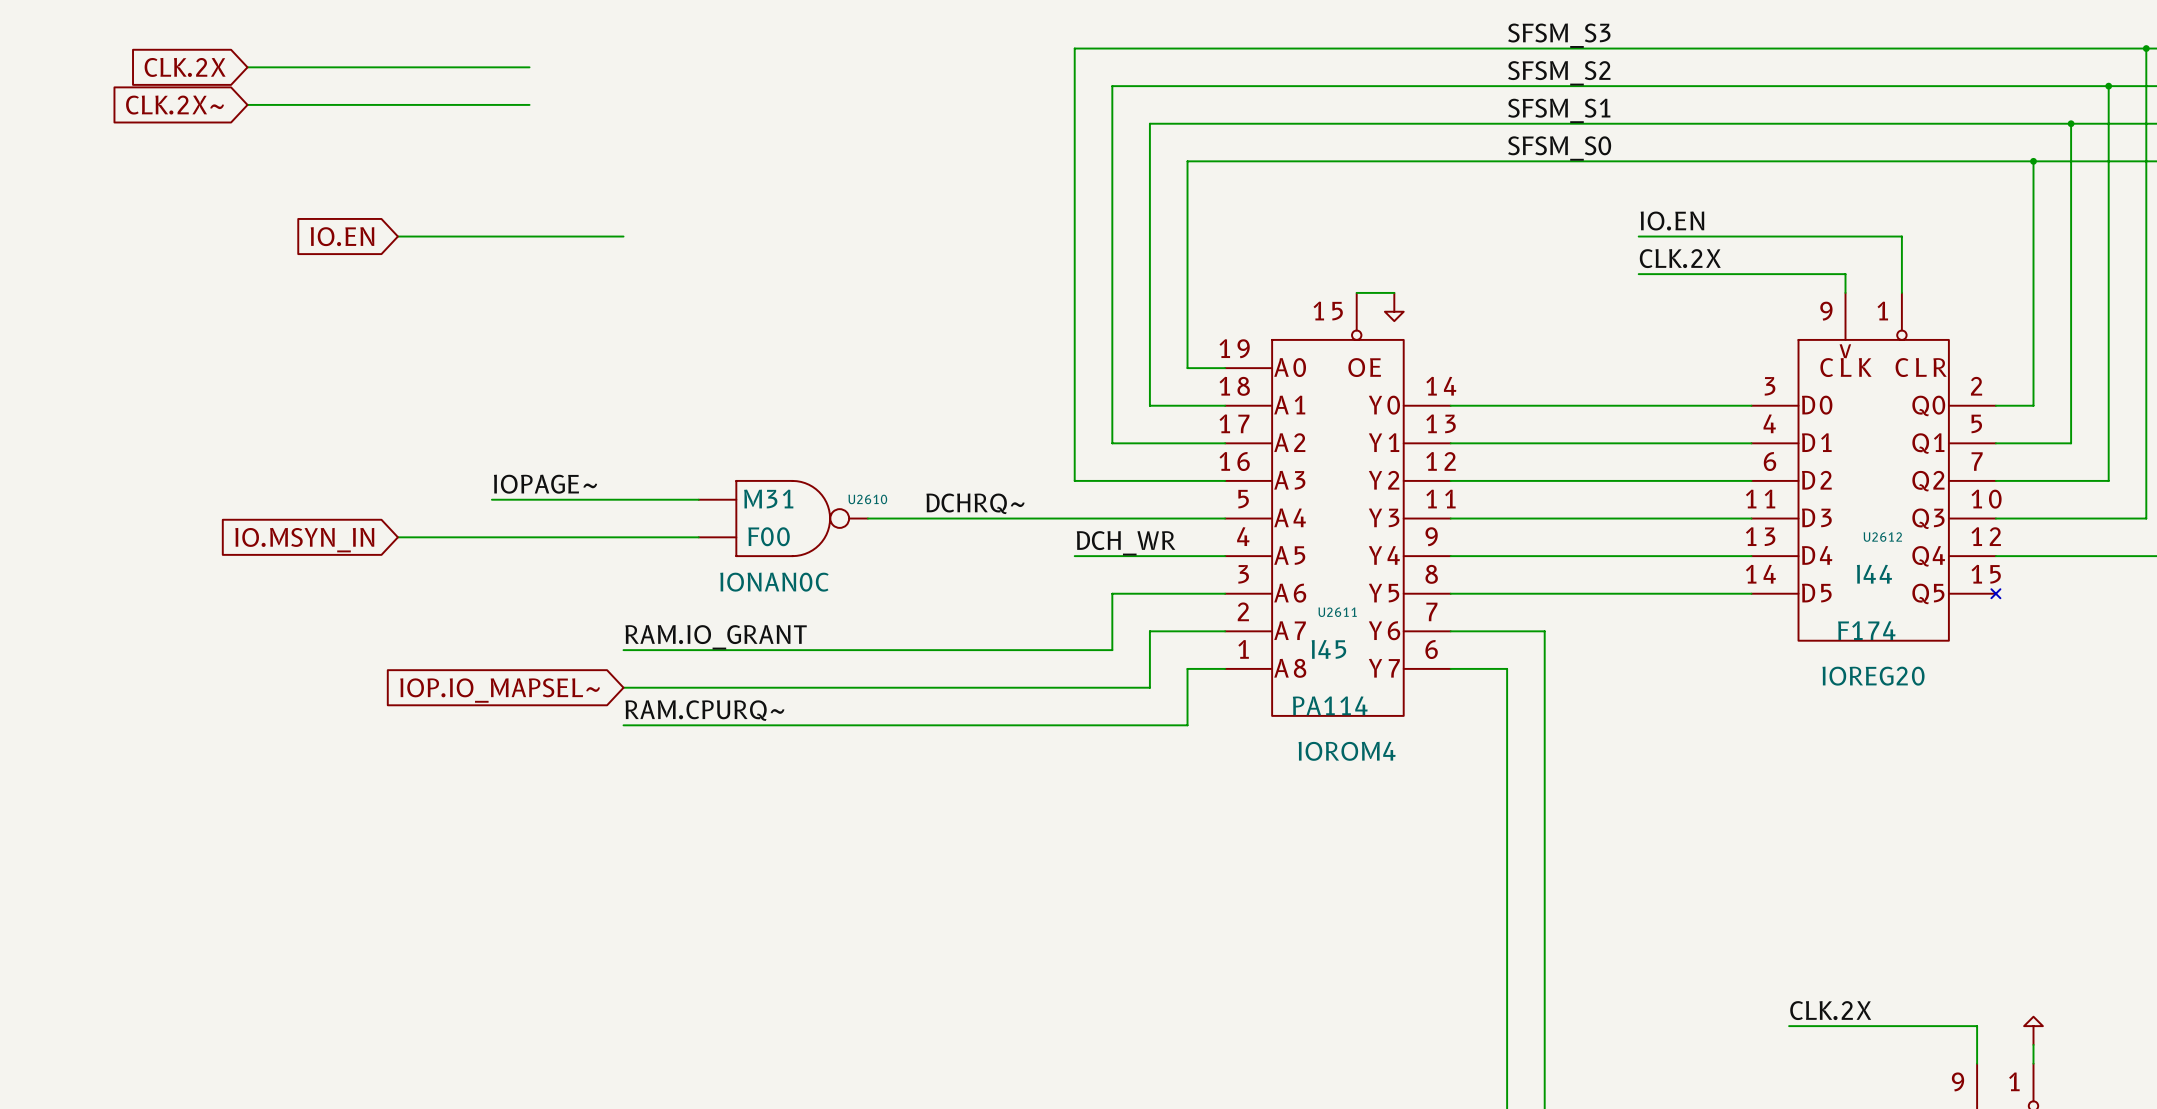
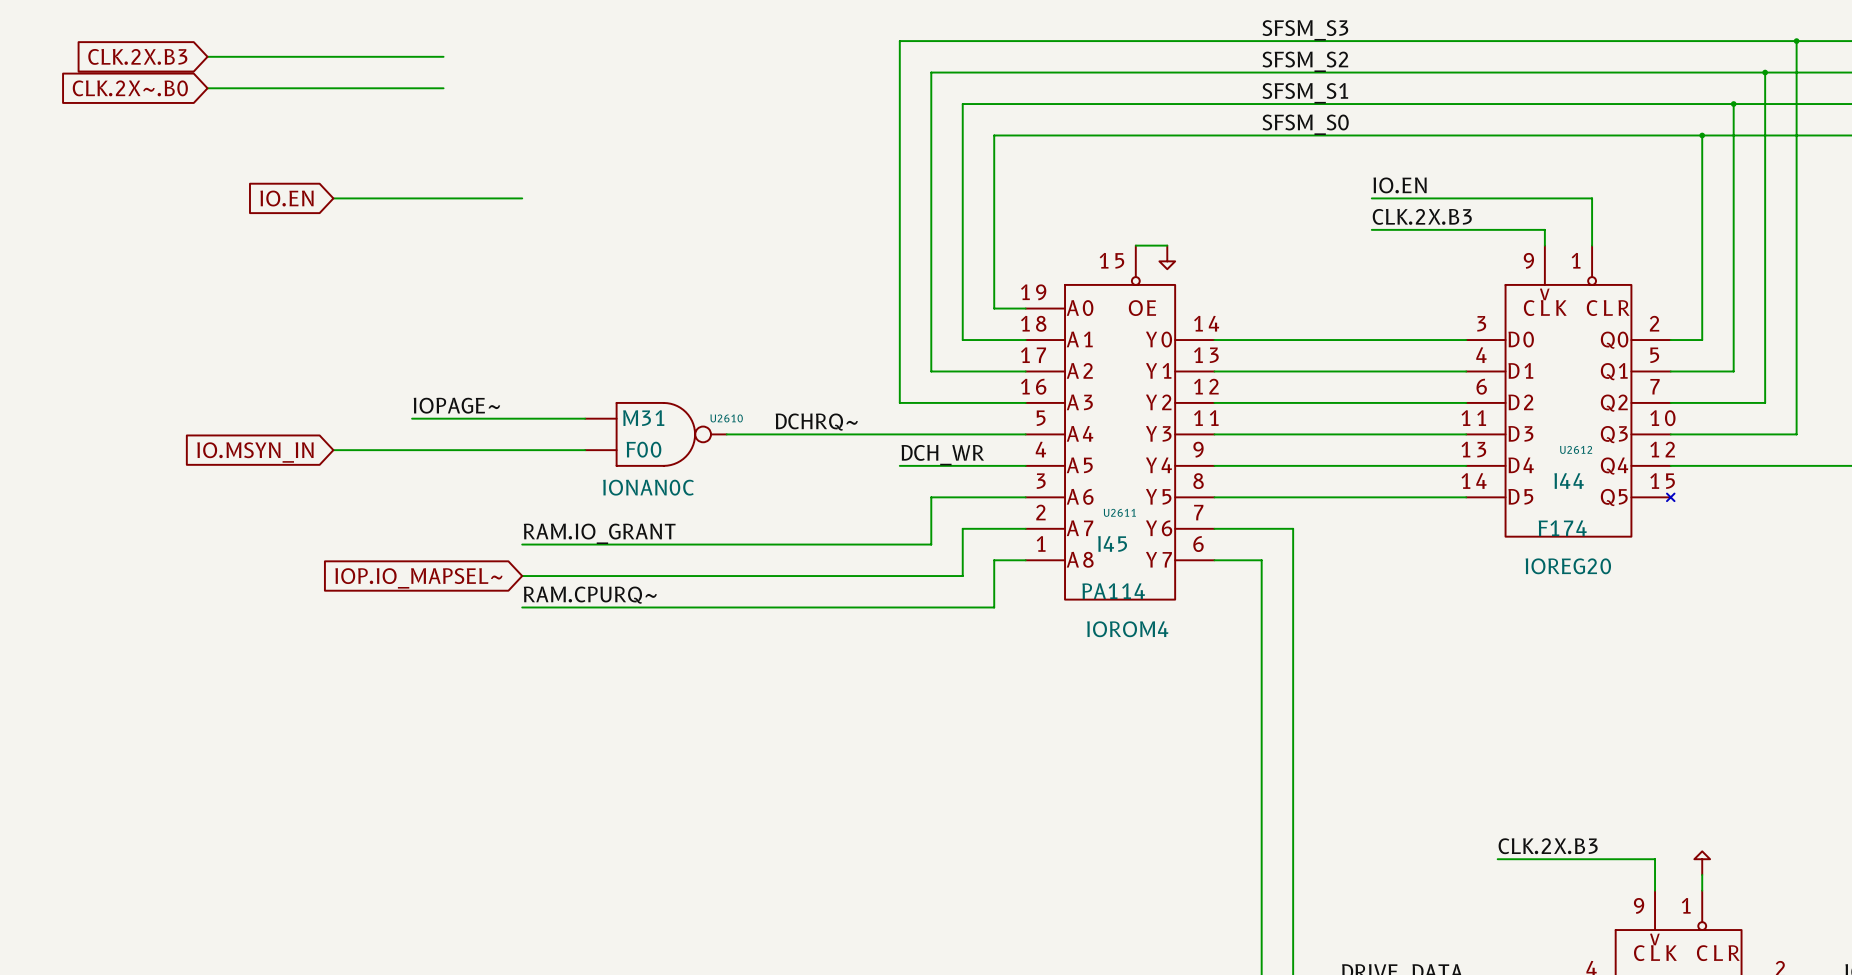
global label: CLK.2X (185, 67) -> CLK.2X.B3 (137, 56)
global label: CLK.2X~ (175, 105) -> CLK.2X~.B0 (130, 88)
label: CLK.2X (1680, 258) -> CLK.2X.B3 (1422, 216)
label: CLK.2X (1830, 1010) -> CLK.2X.B3 (1548, 846)

